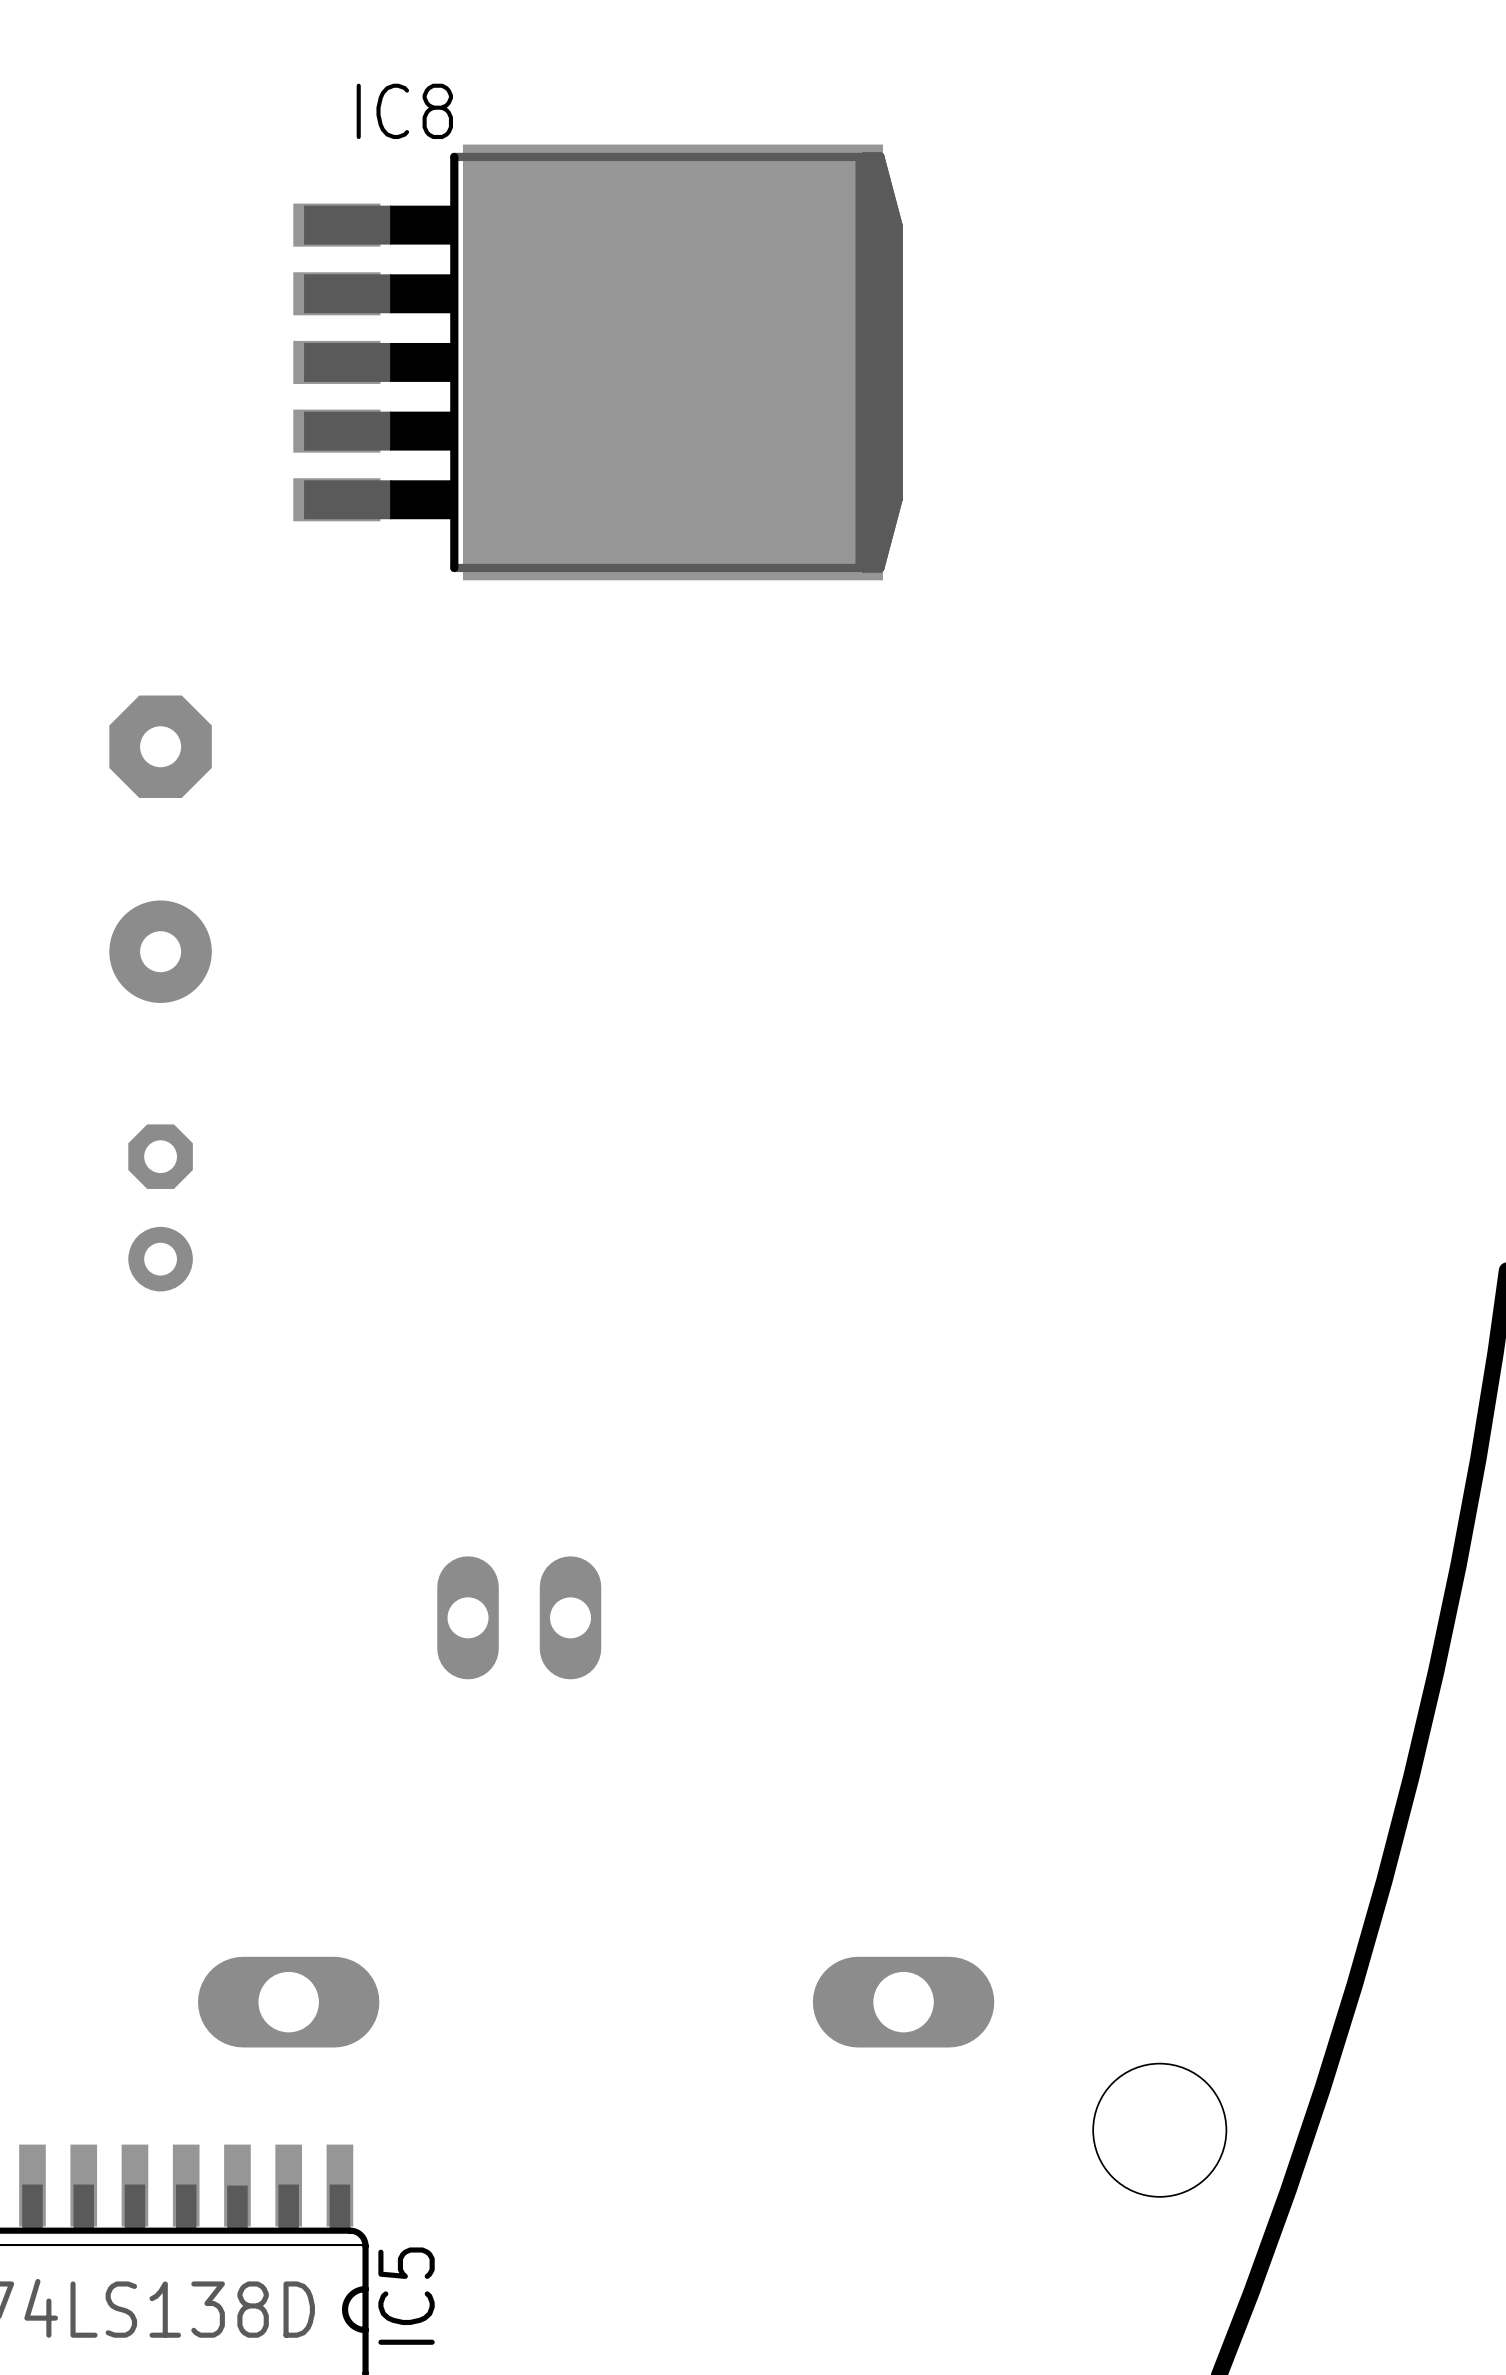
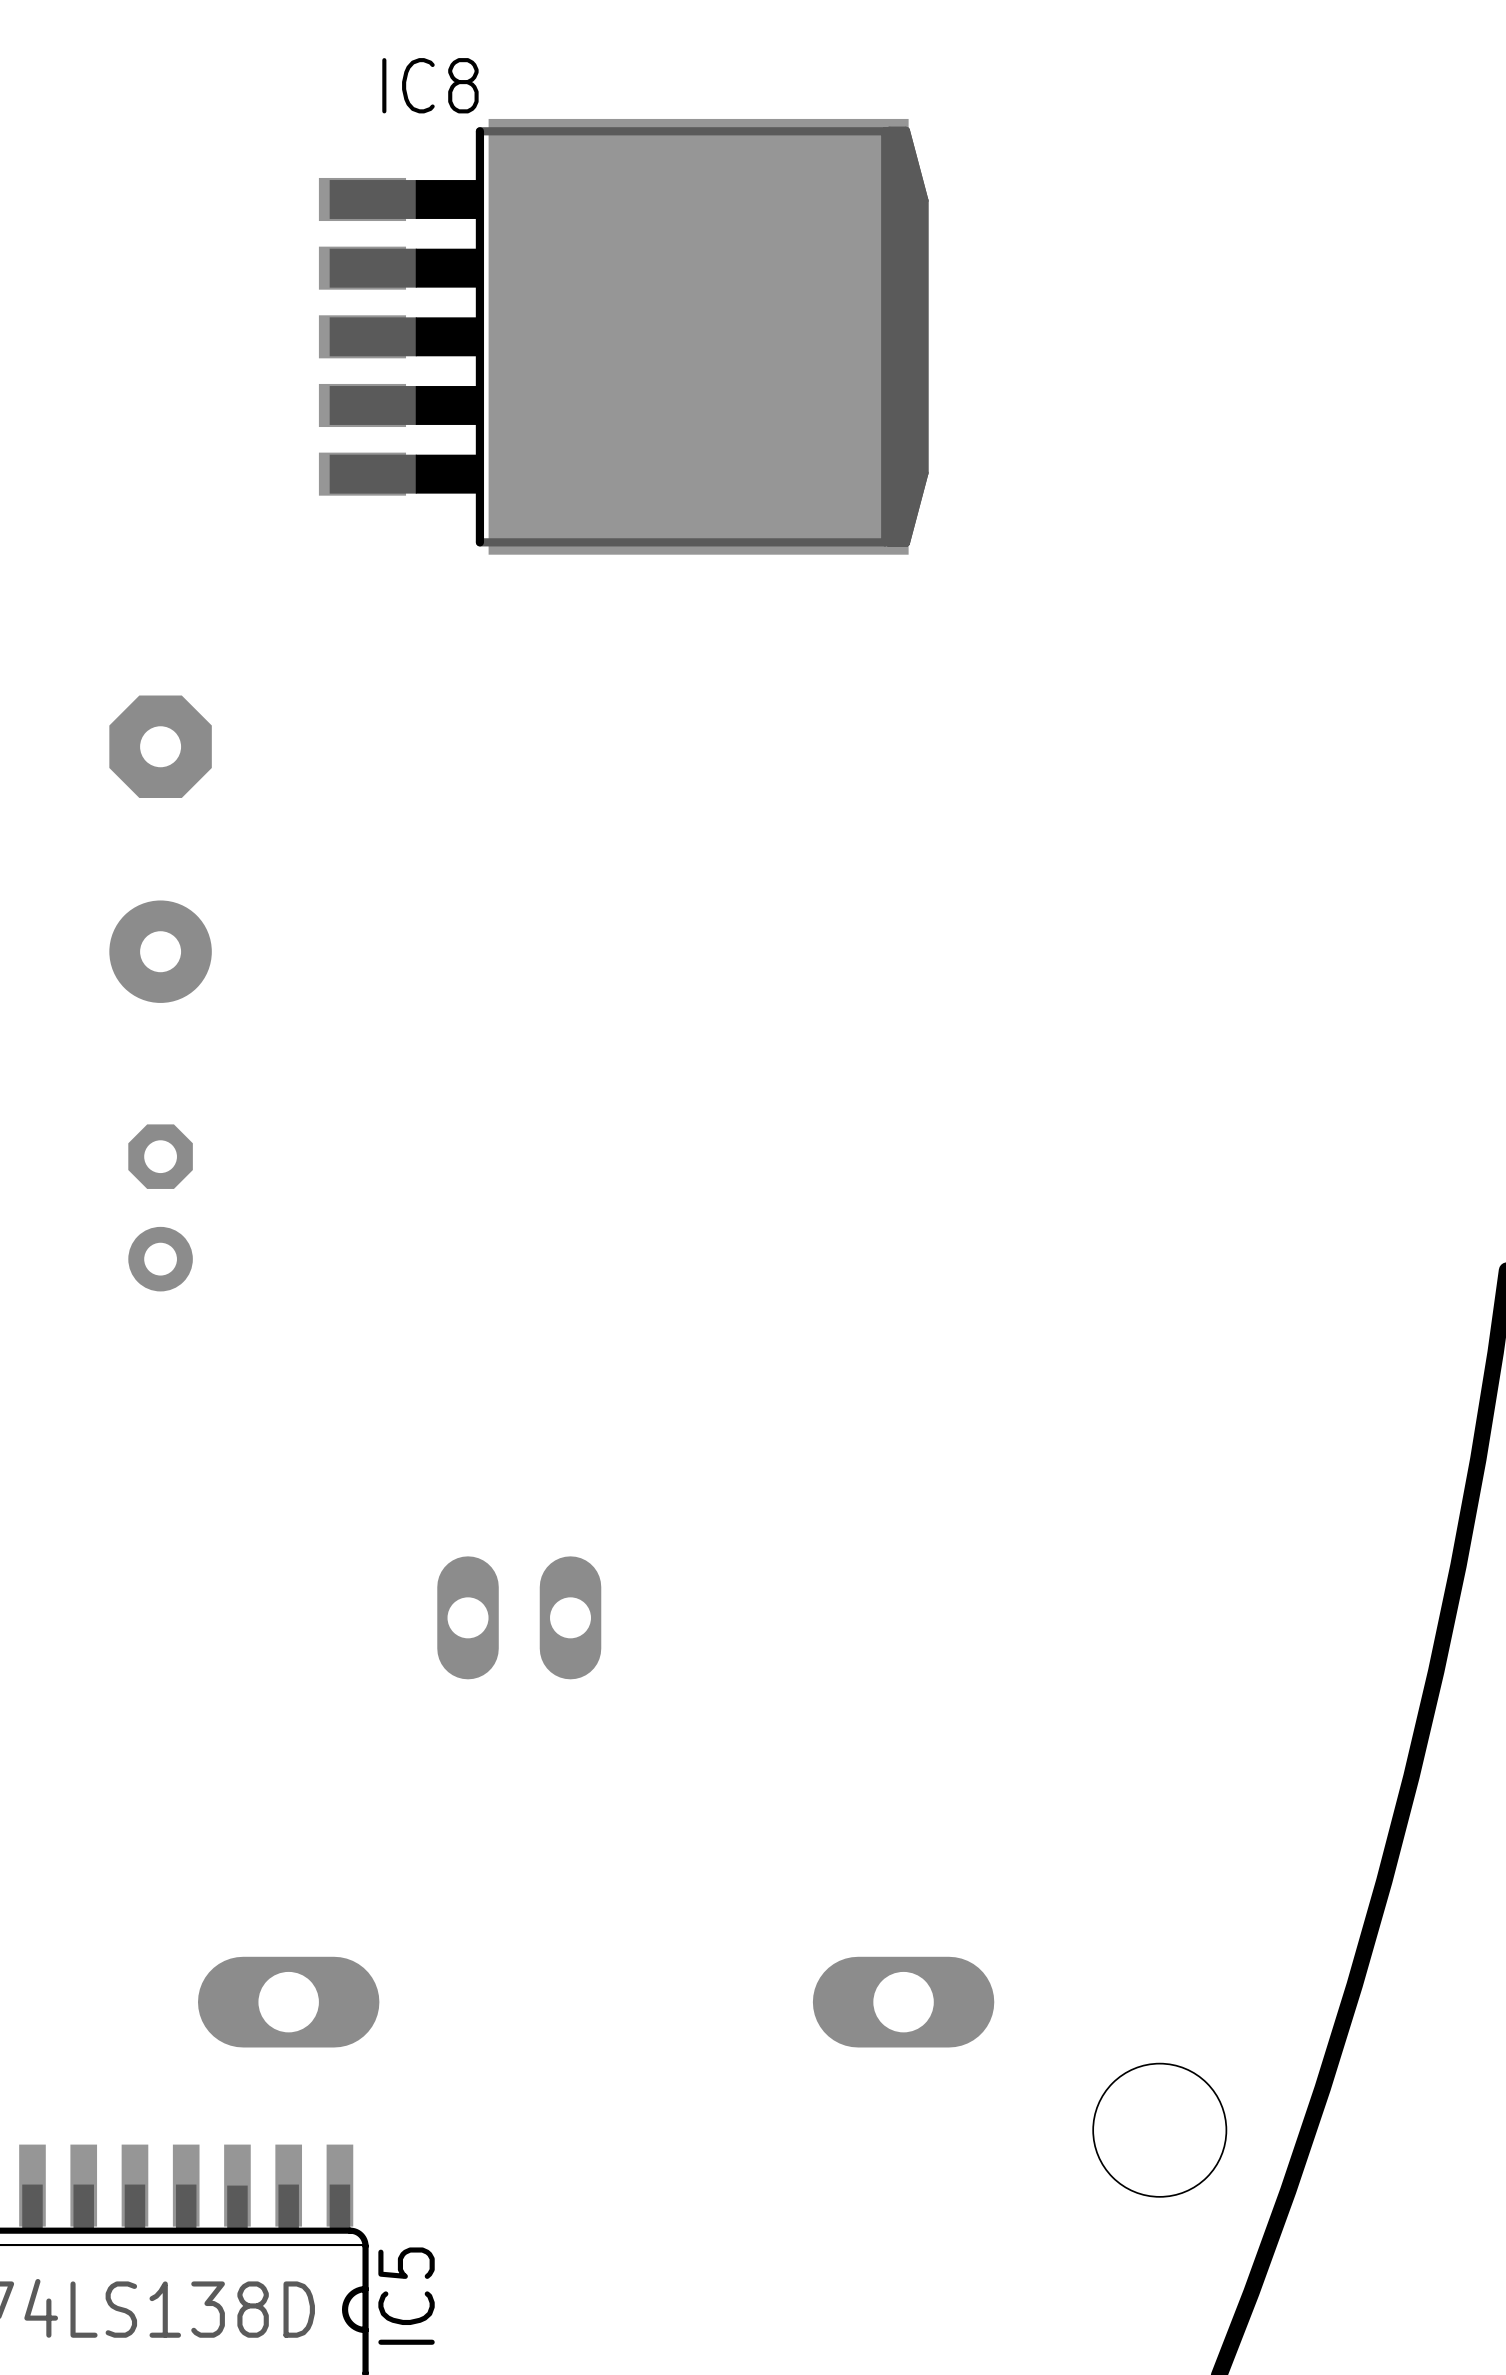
IC8 name position: IC8 (404, 111) -> IC8 (430, 85)
IC8 footprint: [293, 144, 903, 581] -> [318, 118, 929, 555]

